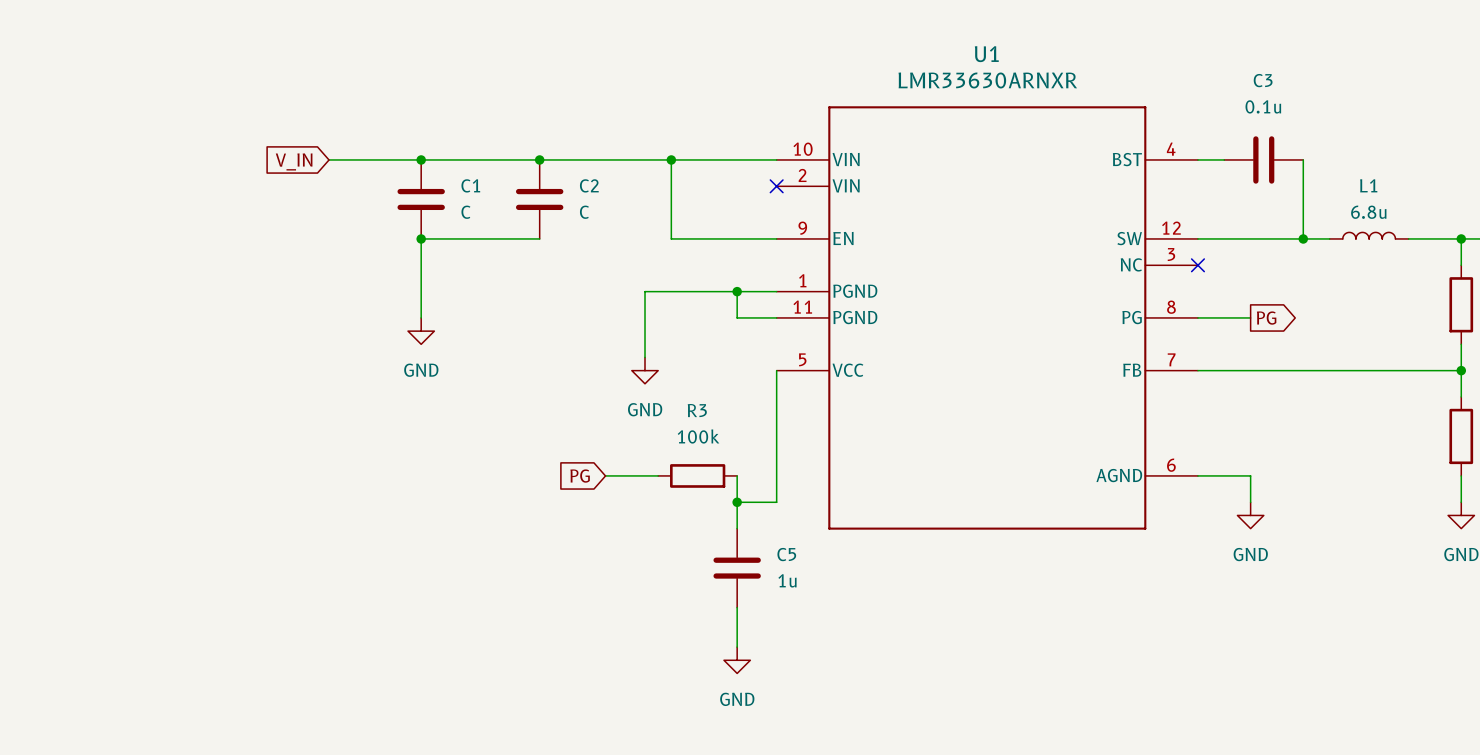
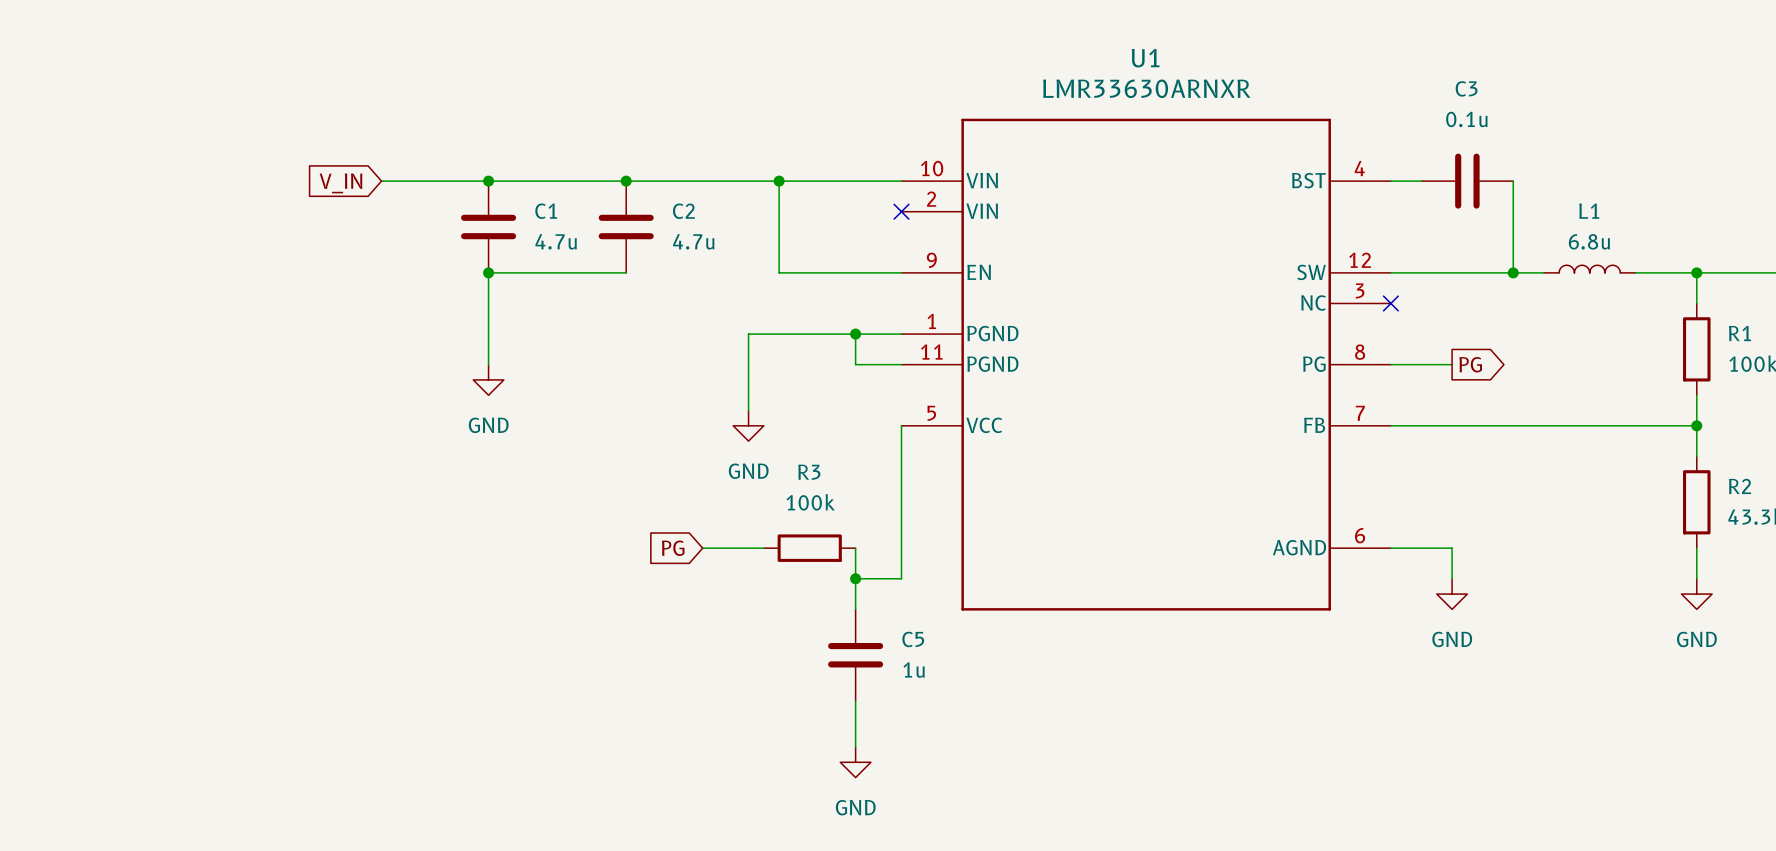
C1 value: C (465, 212) -> 4.7u (556, 241)
C2 value: C (584, 212) -> 4.7u (693, 241)

